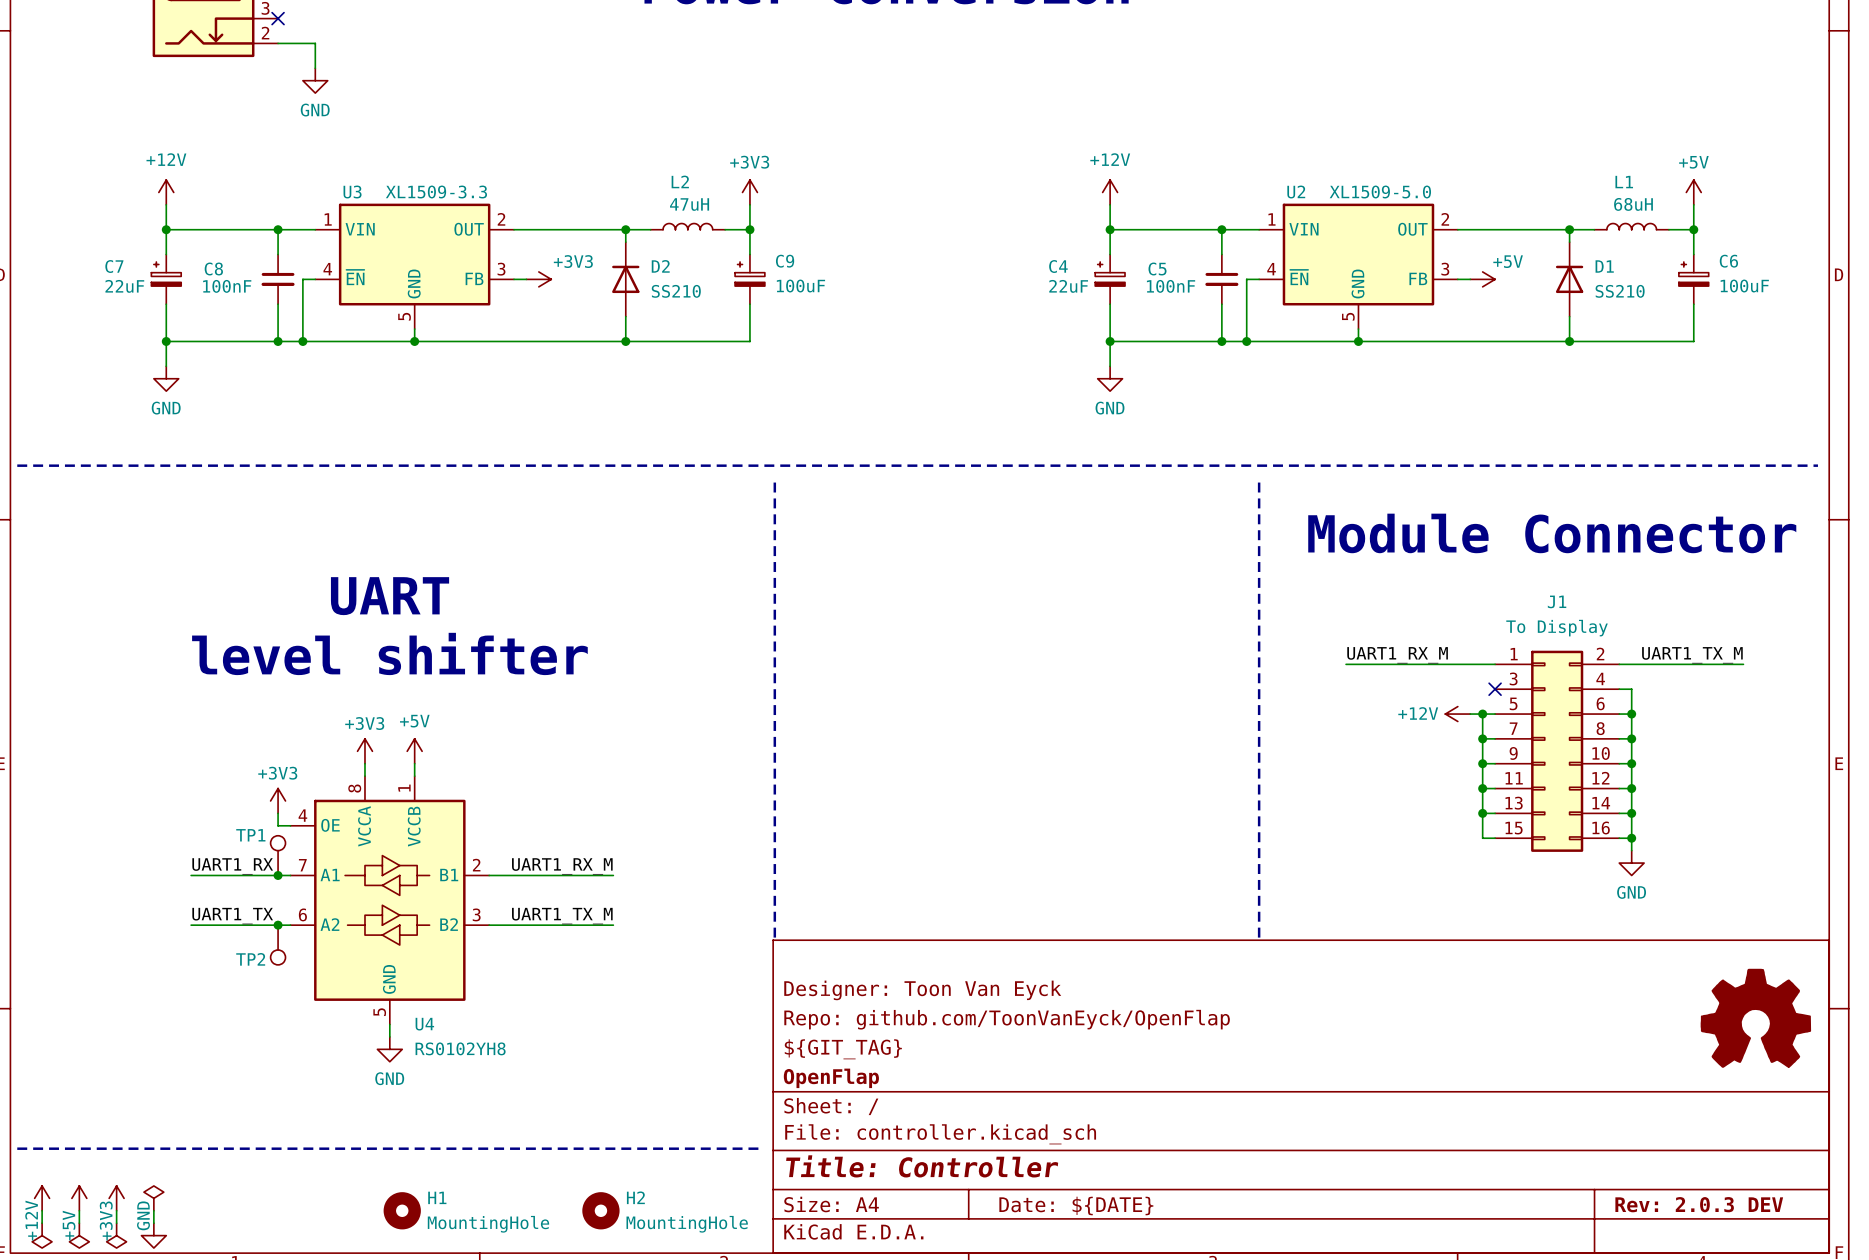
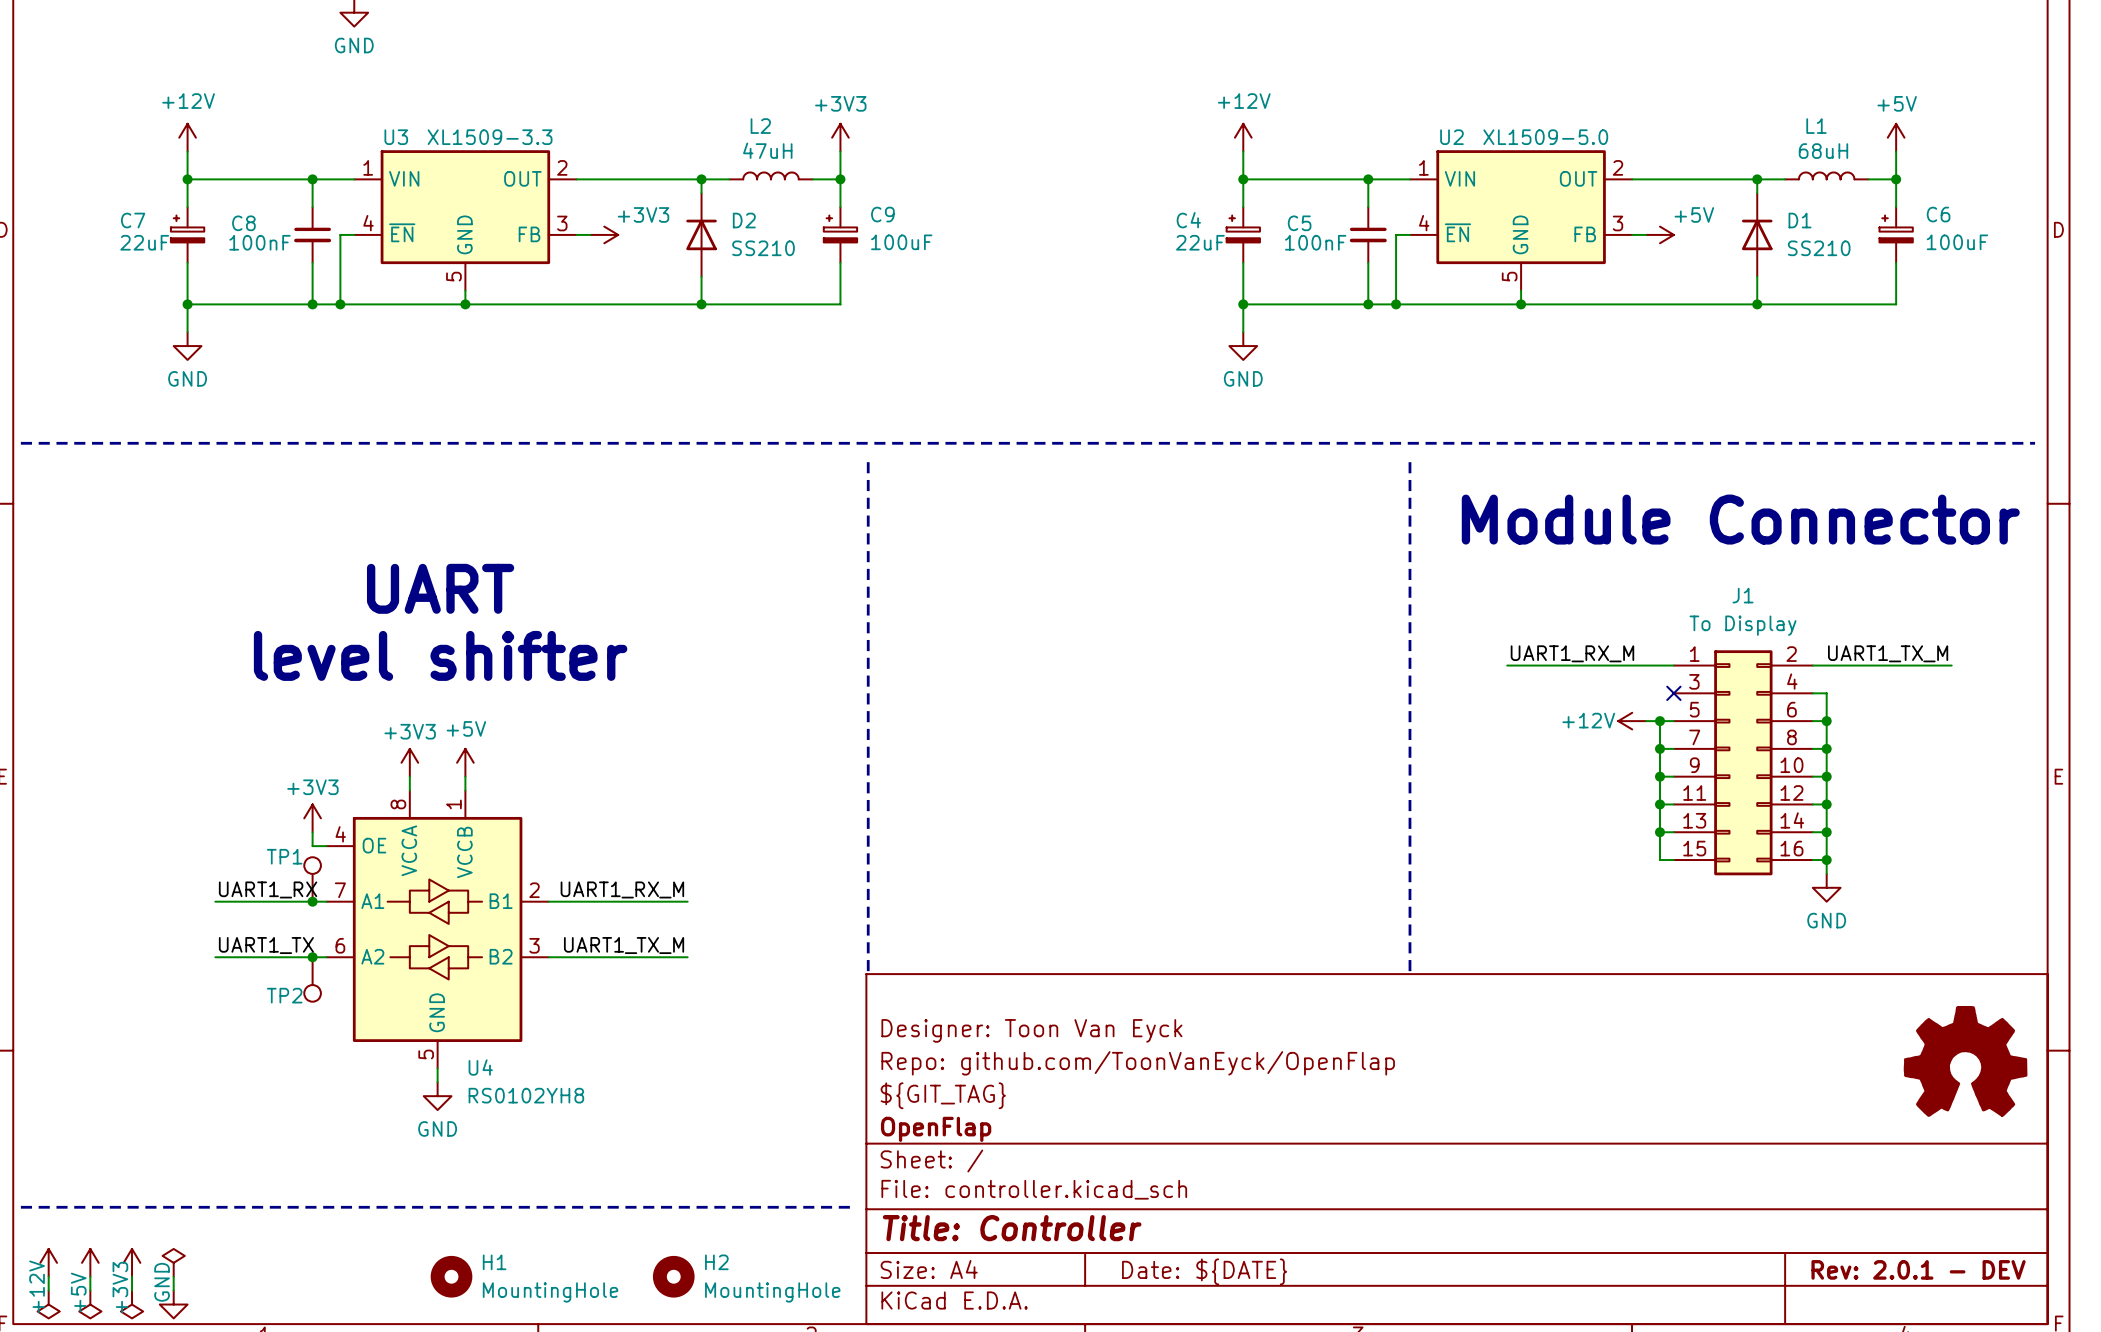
title block: Rev: 2.0.3 DEV (1699, 1204) -> Rev: 2.0.1 - DEV (1918, 1269)

